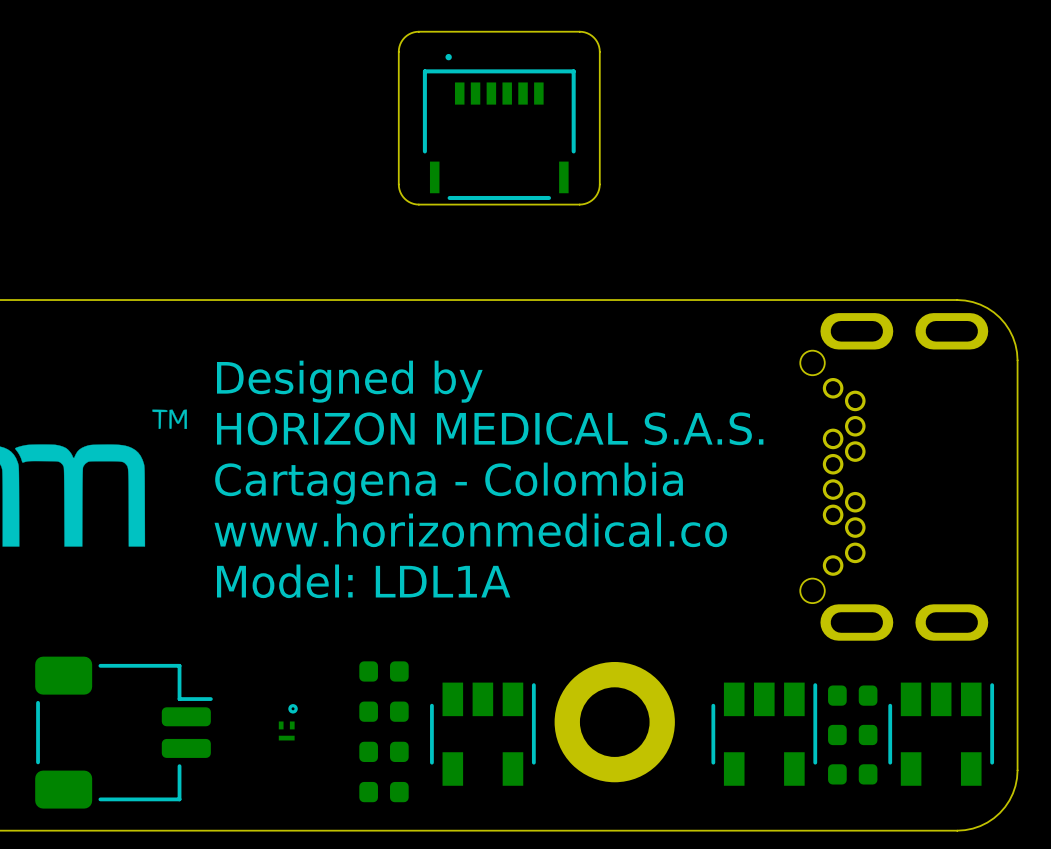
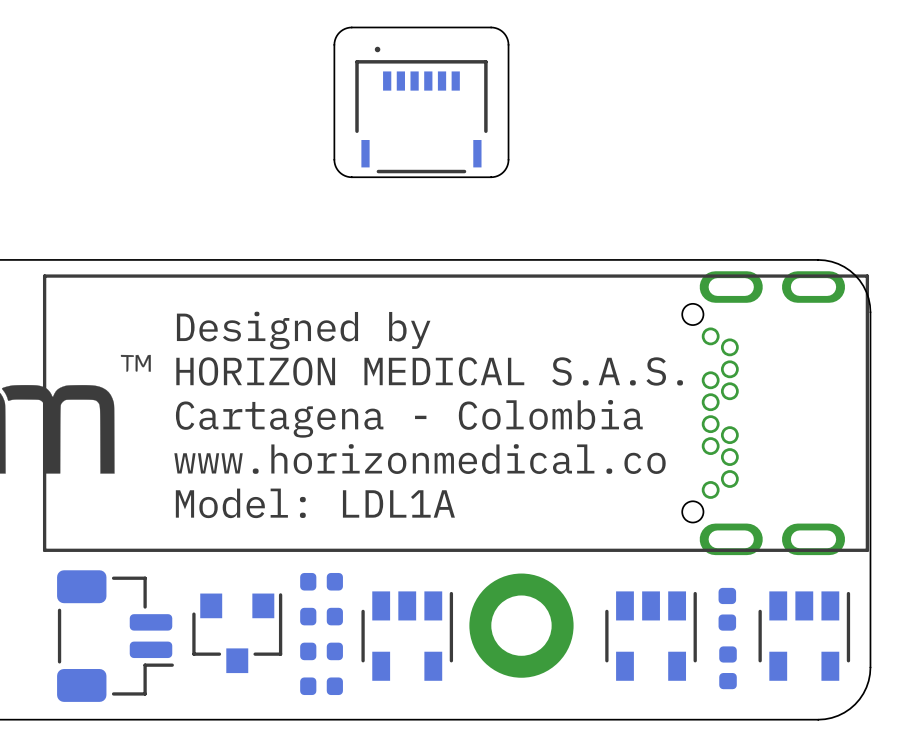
drawing: none -> [42, 274, 870, 552]
part footprint: [35, 656, 213, 809] -> [57, 570, 174, 702]
part rotation: 0° (852, 695) -> 90° clockwise (727, 609)
part footprint: [278, 704, 298, 741] -> [192, 593, 283, 674]
part: (852, 734) -> none
part rotation: 0° (852, 774) -> 90° clockwise (728, 667)

